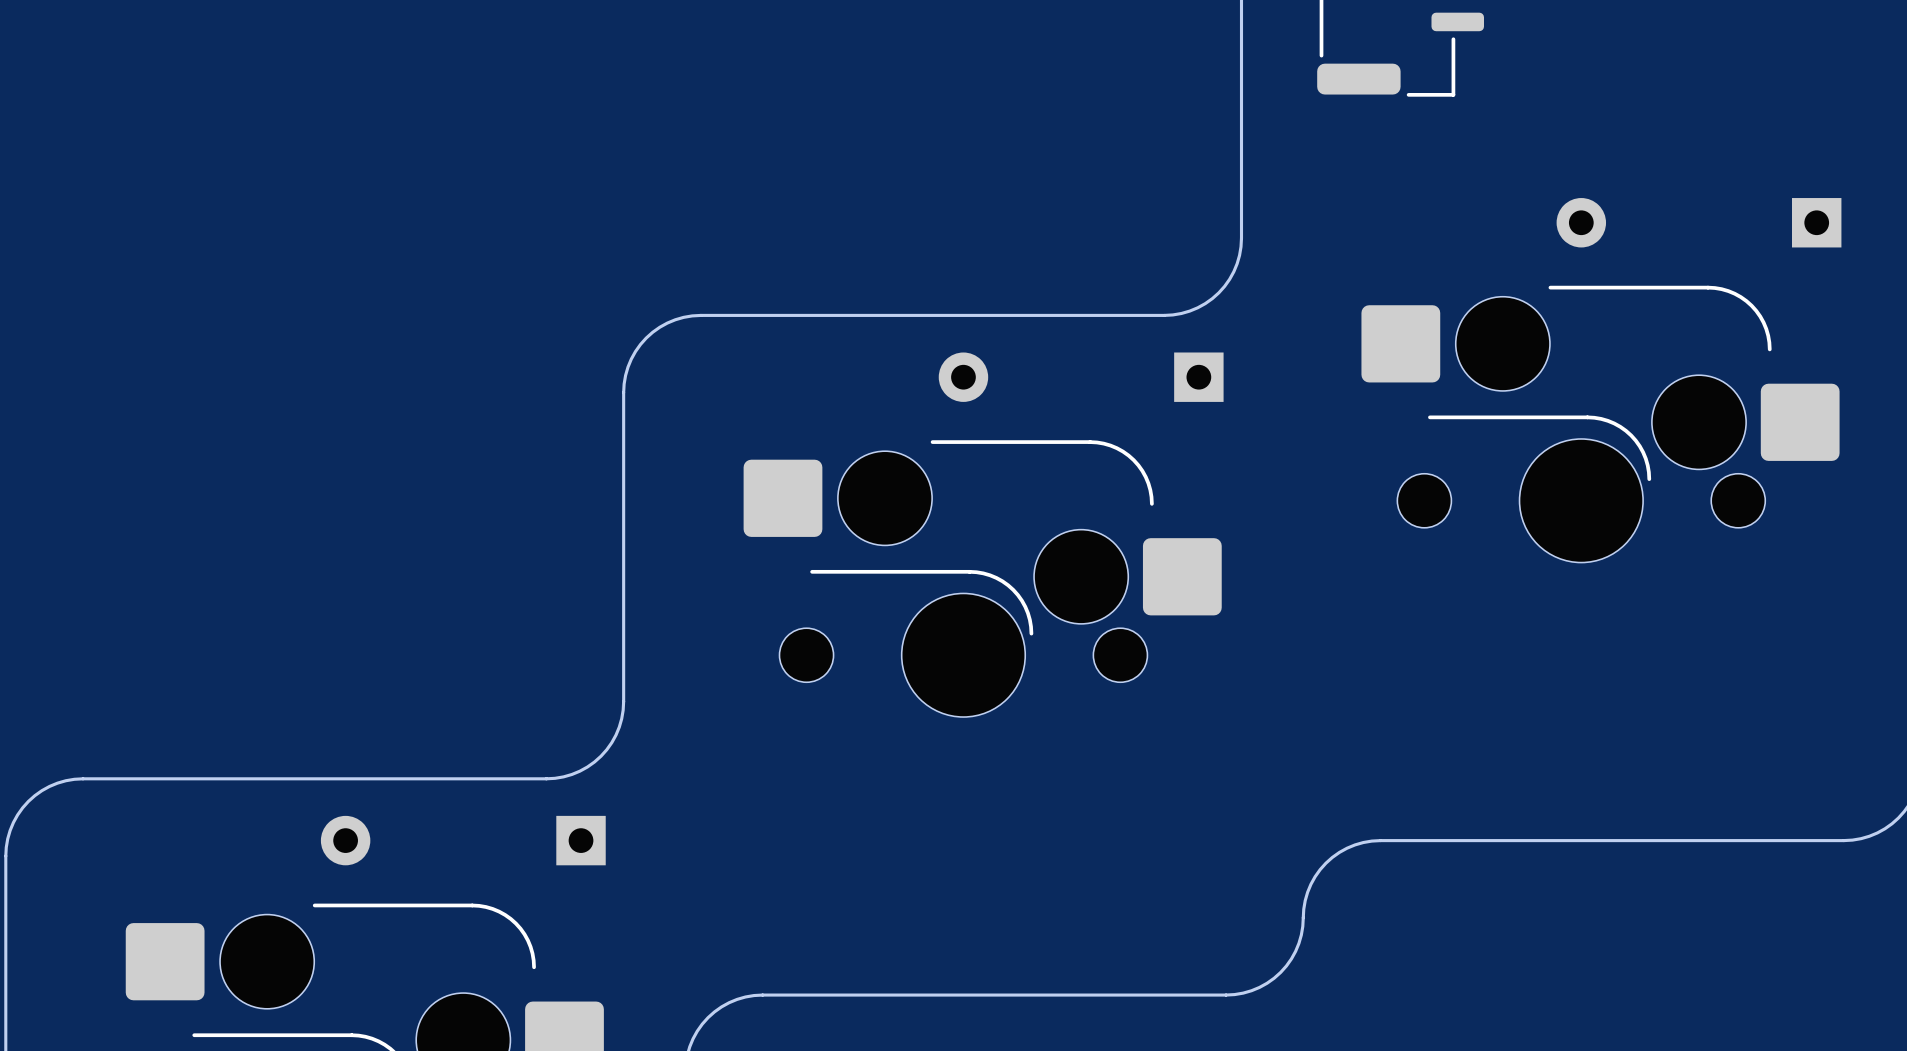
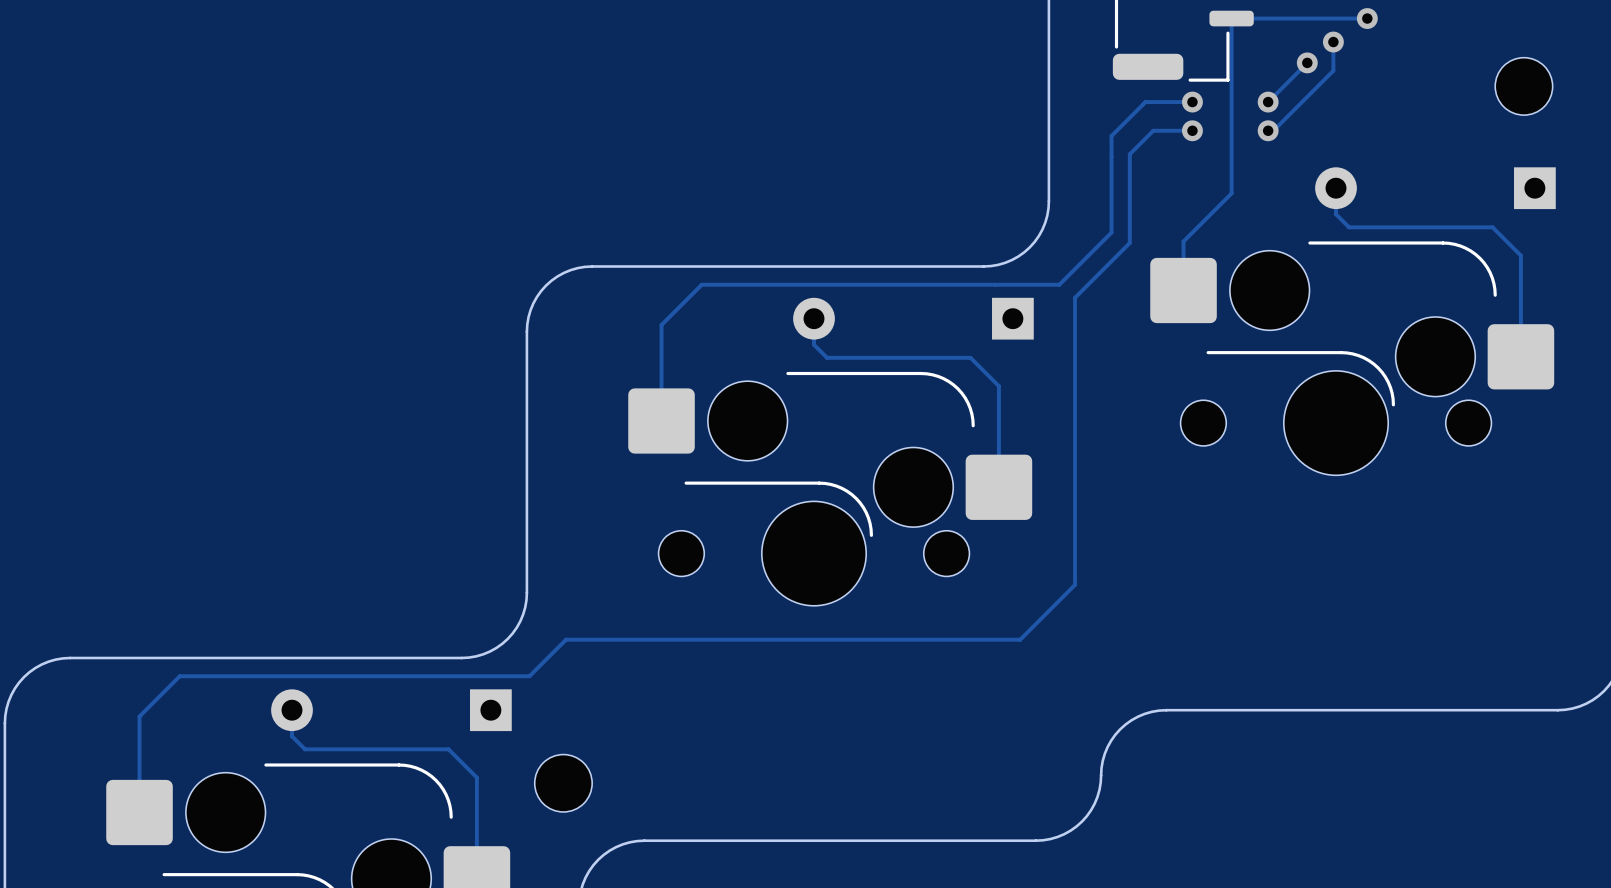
track: none -> (1367, 18) (1231, 18) (1231, 193) (1183, 241) (1183, 290)
via: none -> (1367, 18)
track: none -> (1333, 42) (1333, 70) (1273, 130) (1268, 130)
via: none -> (1333, 42)
track: none -> (1307, 62) (1268, 102)
via: none -> (1307, 62)
part: none -> (1523, 86)
track: none -> (1192, 102) (1145, 102) (1111, 135) (1111, 232) (1059, 284) (701, 284) (661, 325) (661, 421)
via: none -> (1192, 102)
via: none -> (1268, 102)
track: none -> (1192, 130) (1153, 130) (1129, 154) (1129, 243) (1075, 297) (1075, 584) (1020, 639) (566, 639) (529, 676) (179, 676) (139, 716) (139, 812)
via: none -> (1192, 130)
via: none -> (1268, 130)
track: none -> (1336, 188) (1336, 214) (1349, 227) (1492, 227) (1520, 255) (1520, 356)
track: none -> (814, 318) (814, 344) (827, 357) (970, 357) (998, 386) (998, 487)
track: none -> (292, 710) (292, 736) (305, 749) (448, 749) (476, 777) (476, 878)
part: none -> (563, 783)

